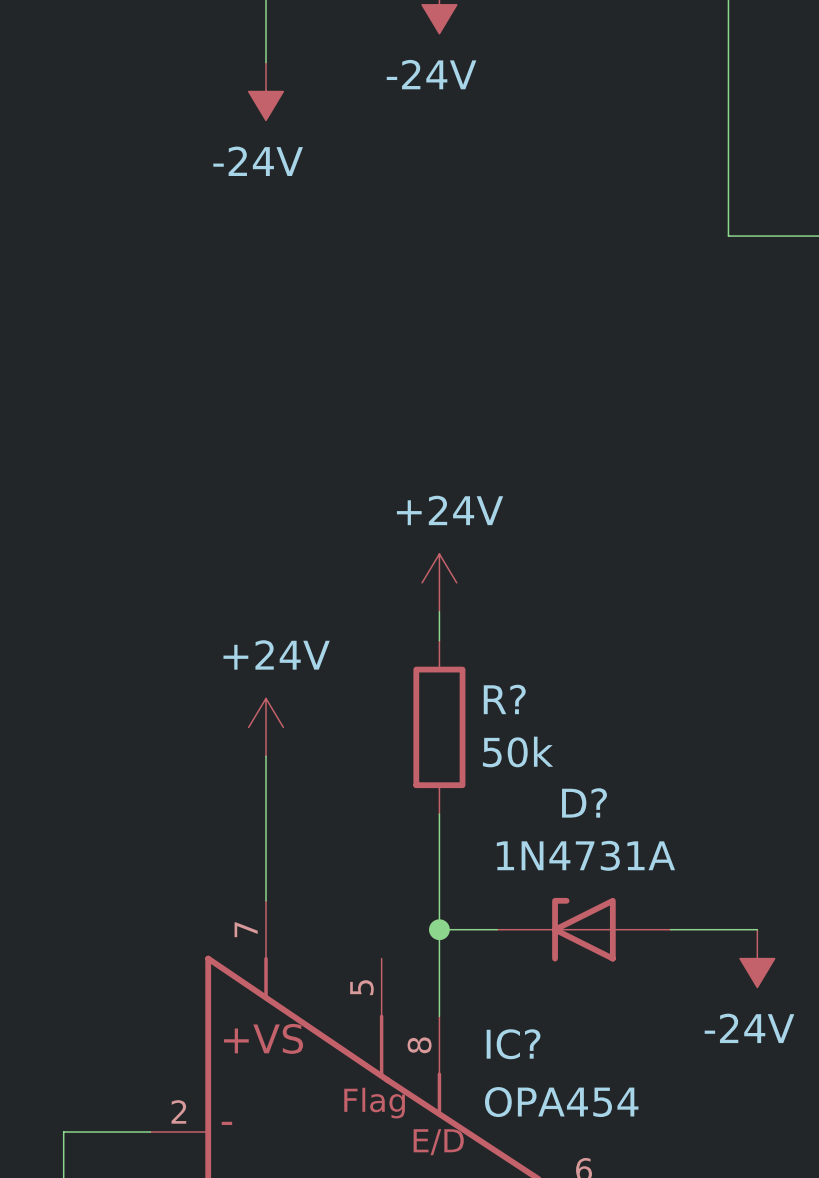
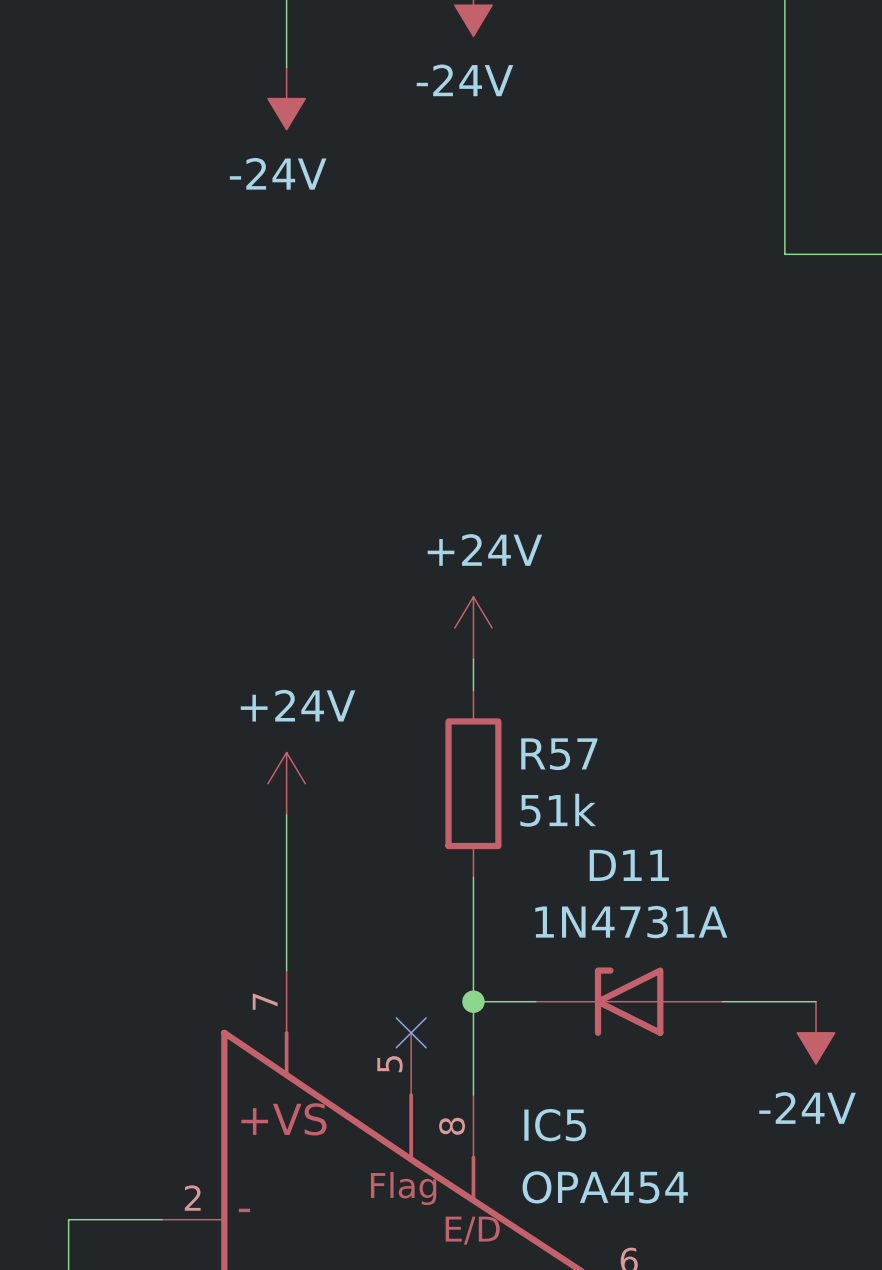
R? name: R? (504, 699) -> R57 (559, 754)
R? value: 50k (518, 751) -> 51k (558, 810)
D? name: D? (584, 802) -> D11 (629, 865)
no-connect mark: none -> (411, 1032)
IC? name: IC? (513, 1044) -> IC5 (555, 1125)

